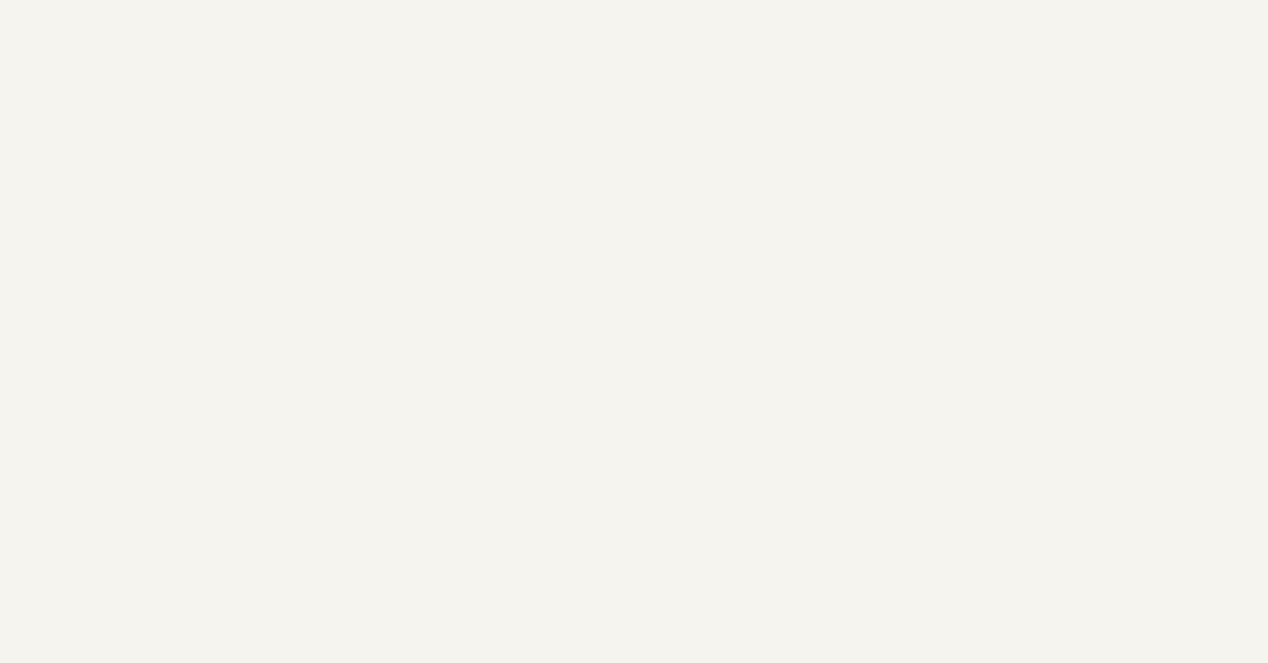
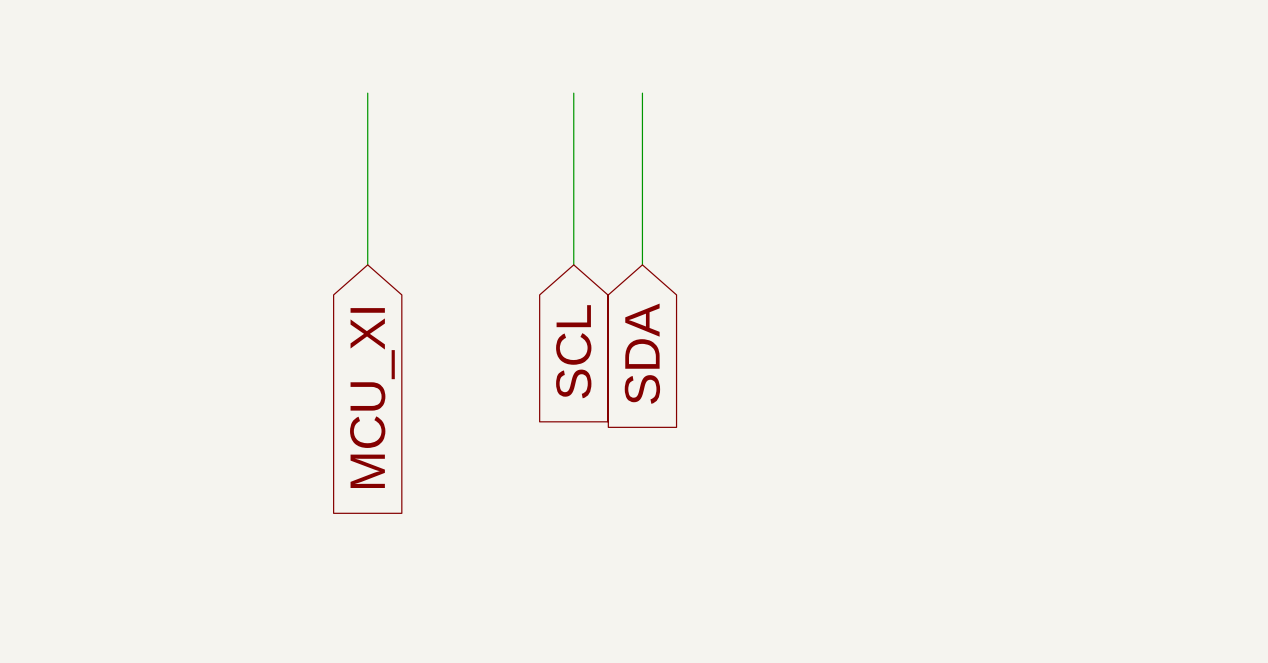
wire: none -> (367, 93) (367, 264)
wire: none -> (573, 93) (573, 264)
wire: none -> (642, 93) (642, 264)
global label: none -> SCL (573, 351)
global label: none -> SDA (642, 353)
global label: none -> MCU_XI (372, 398)

